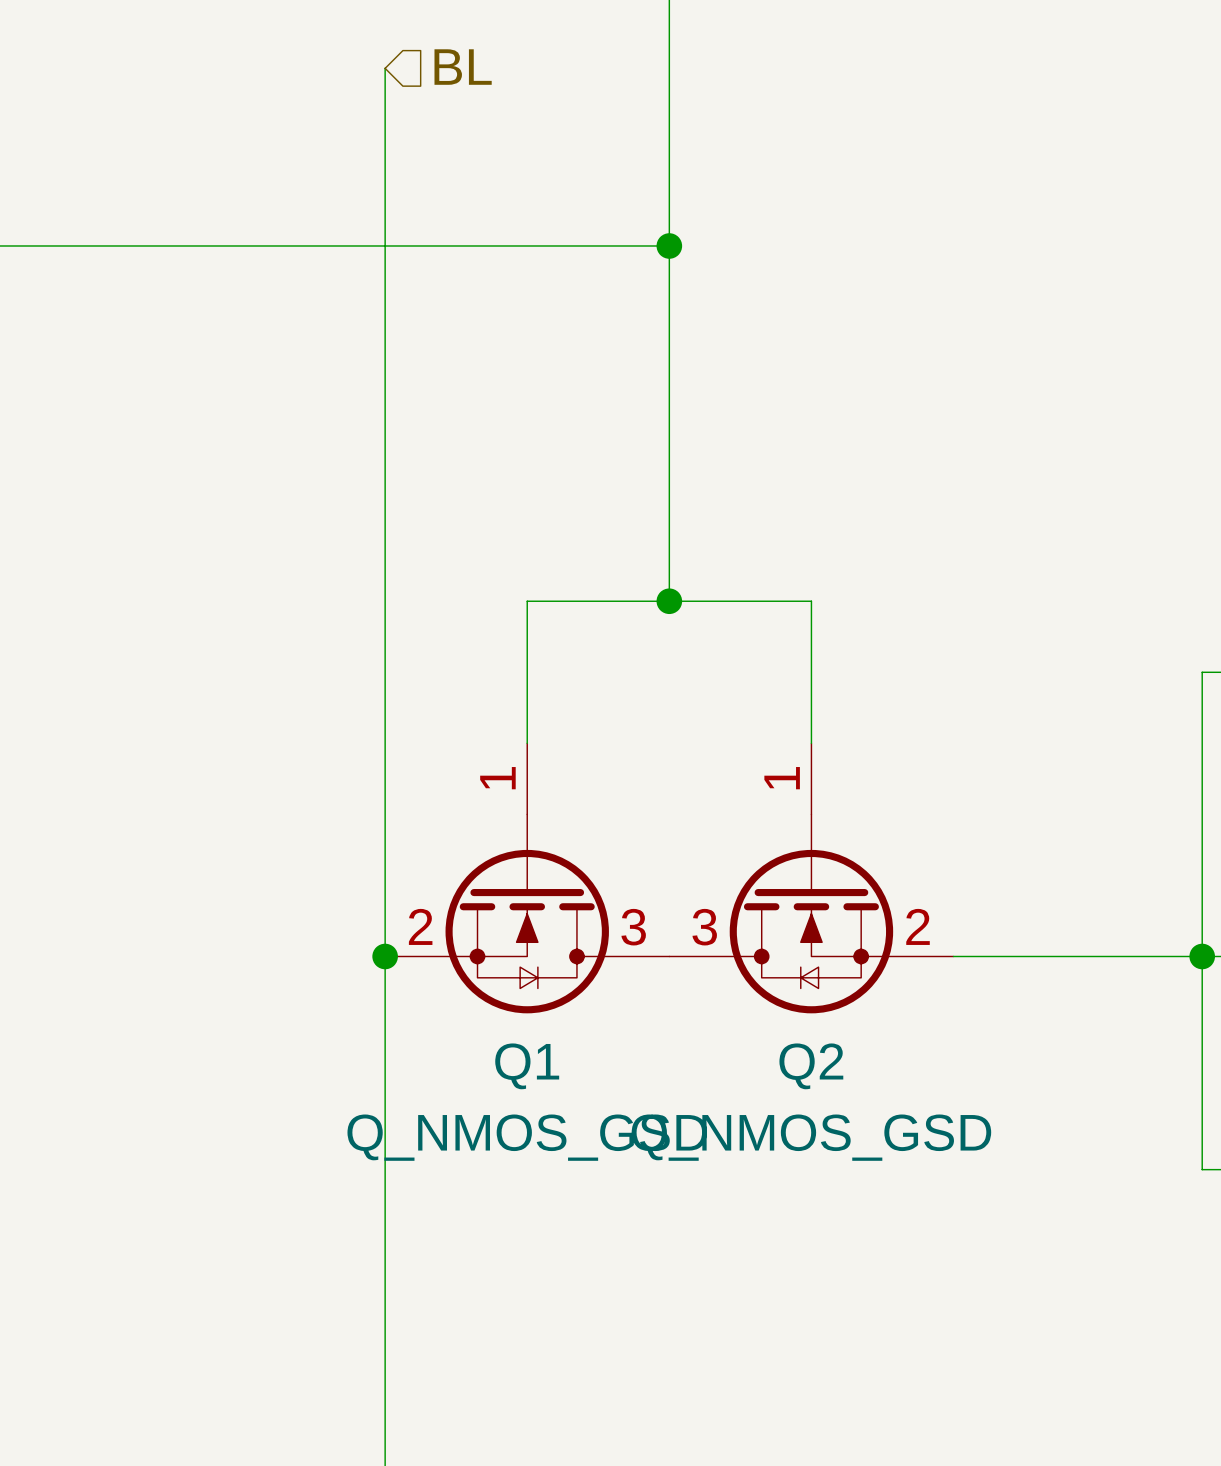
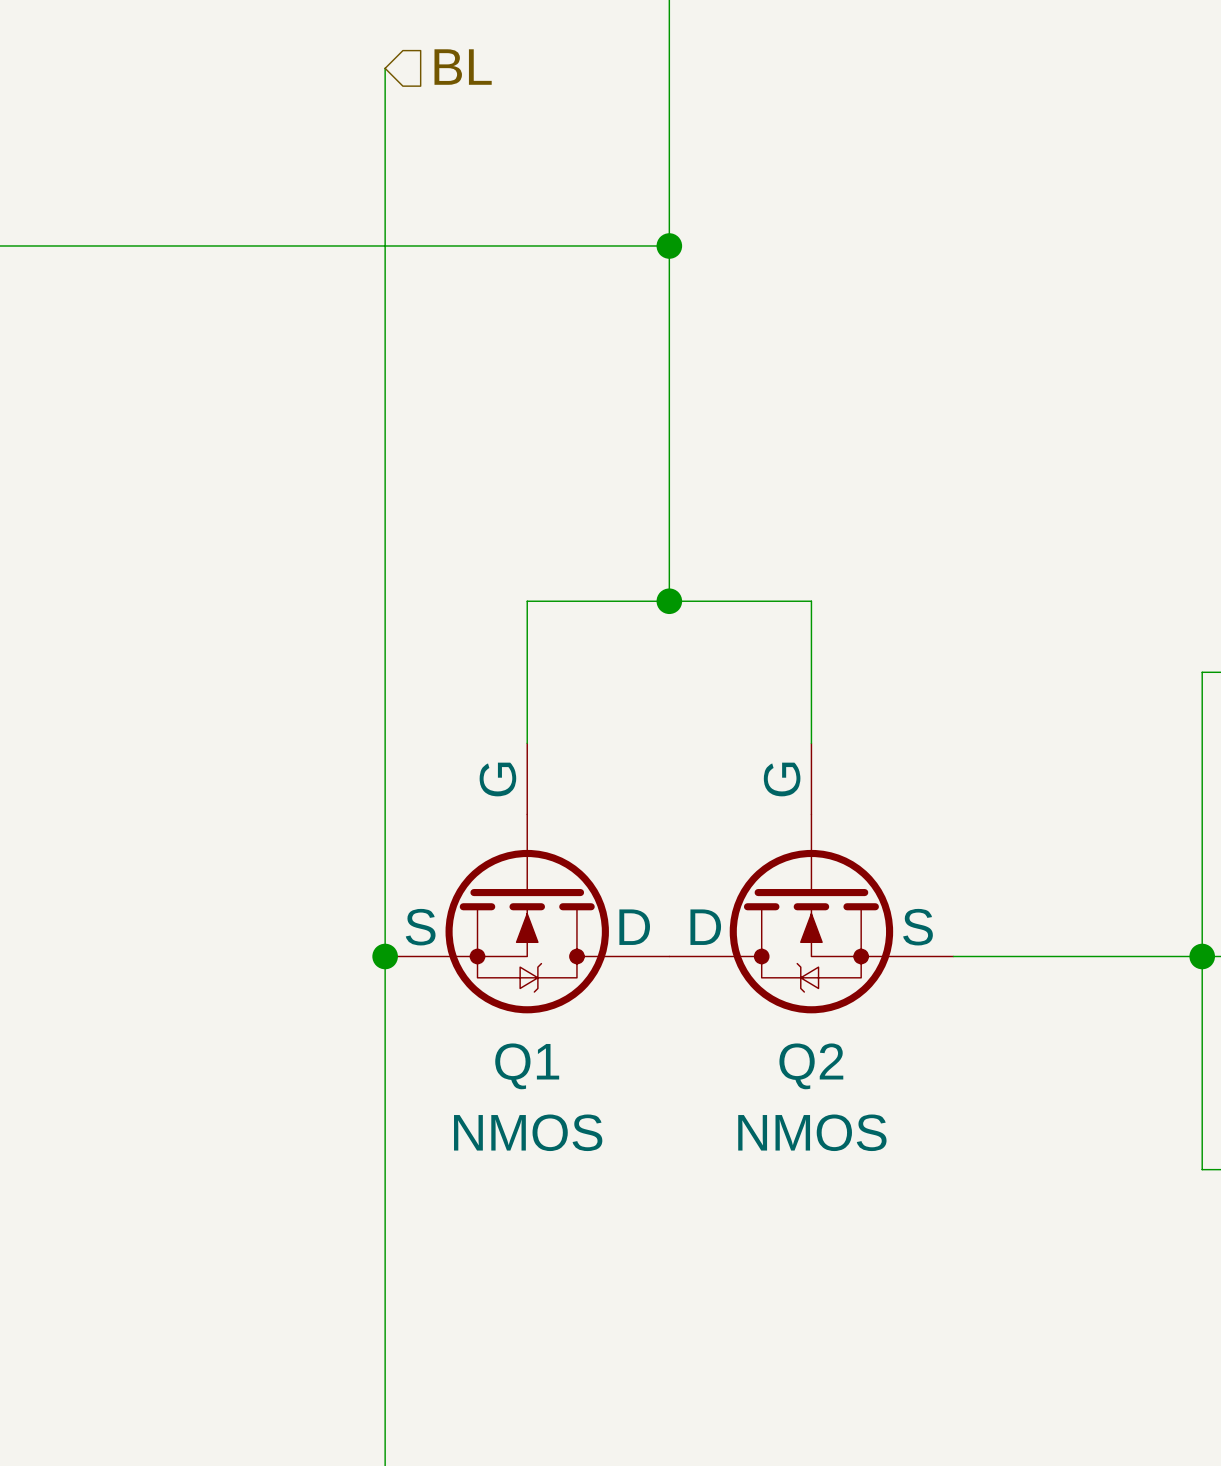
Q1 symbol: [385, 743, 670, 1014] -> [385, 743, 670, 1014]
Q2 symbol: [669, 743, 954, 1014] -> [669, 743, 954, 1014]
Q1 value: Q_NMOS_GSD (527, 1137) -> NMOS (528, 1132)
Q2 value: Q_NMOS_GSD (811, 1137) -> NMOS (812, 1132)

